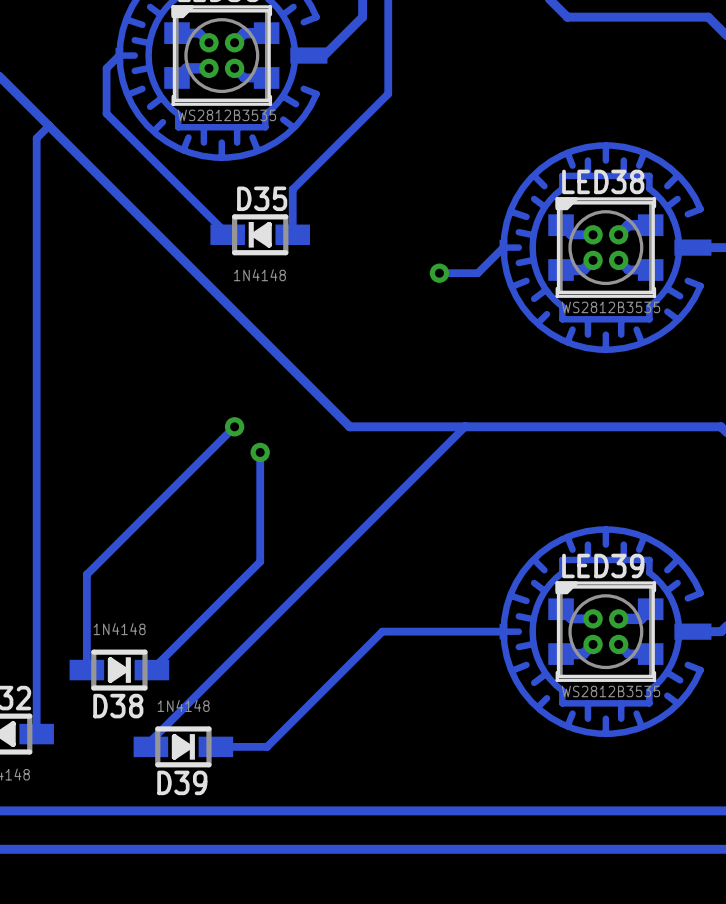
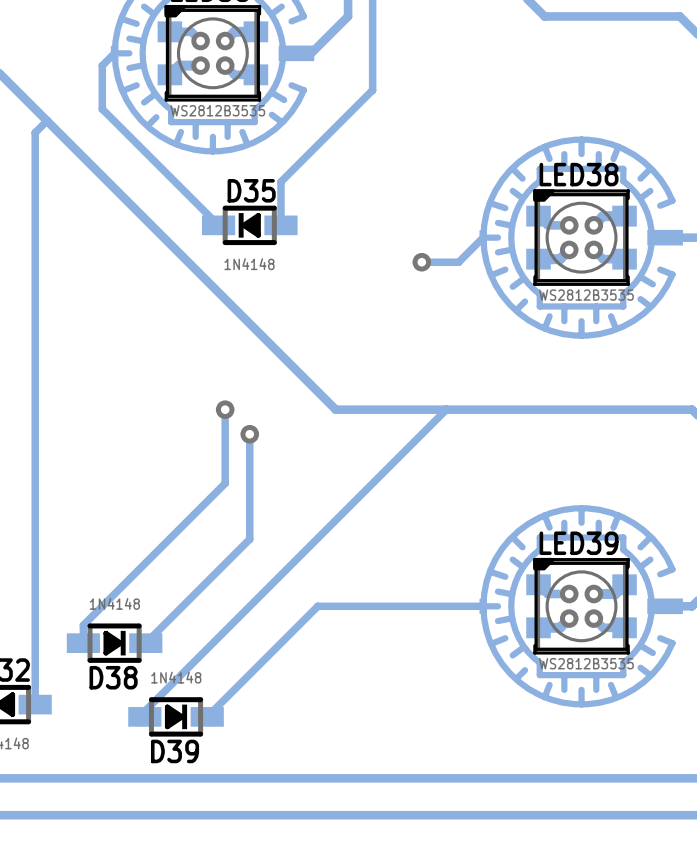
track: (234, 426) (86, 574) (86, 651) -> (225, 409) (225, 483) (83, 625)
track: (382, 631) (267, 746) (215, 746) -> (366, 606) (317, 606) (207, 716)

